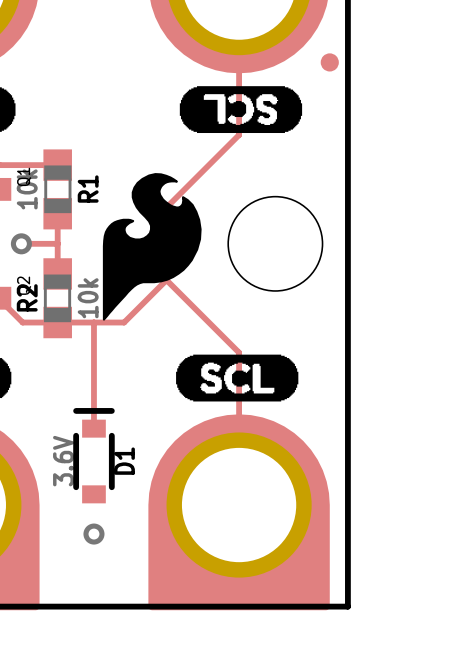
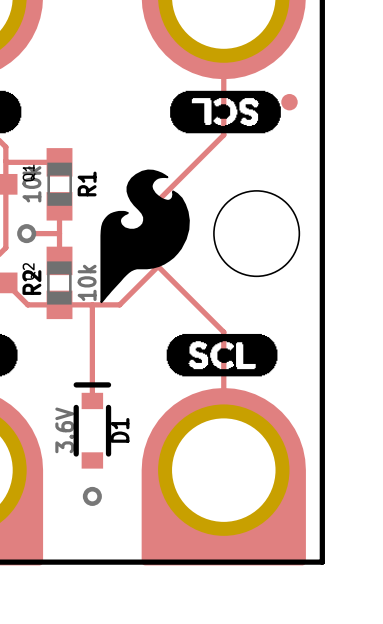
part position: (329, 62) -> (289, 102)

